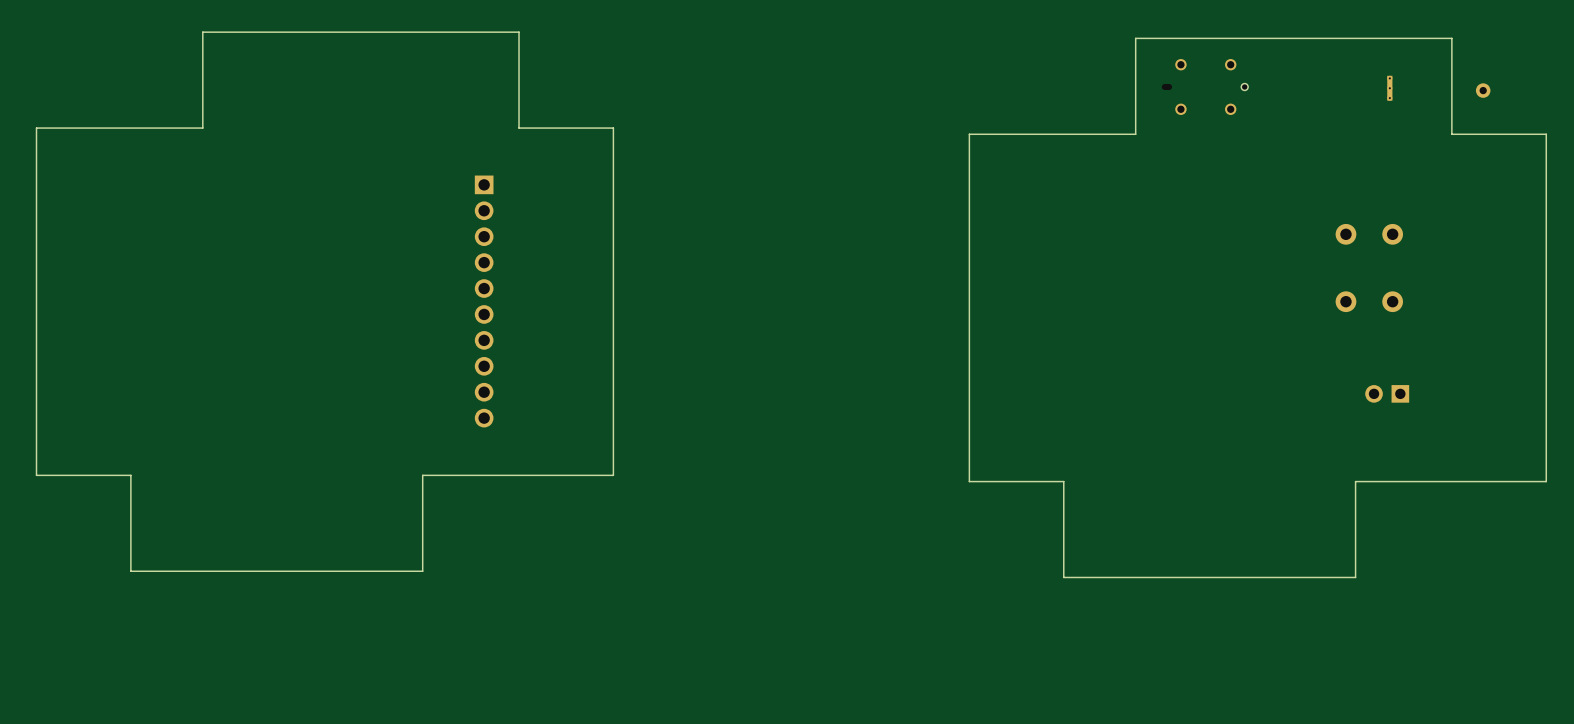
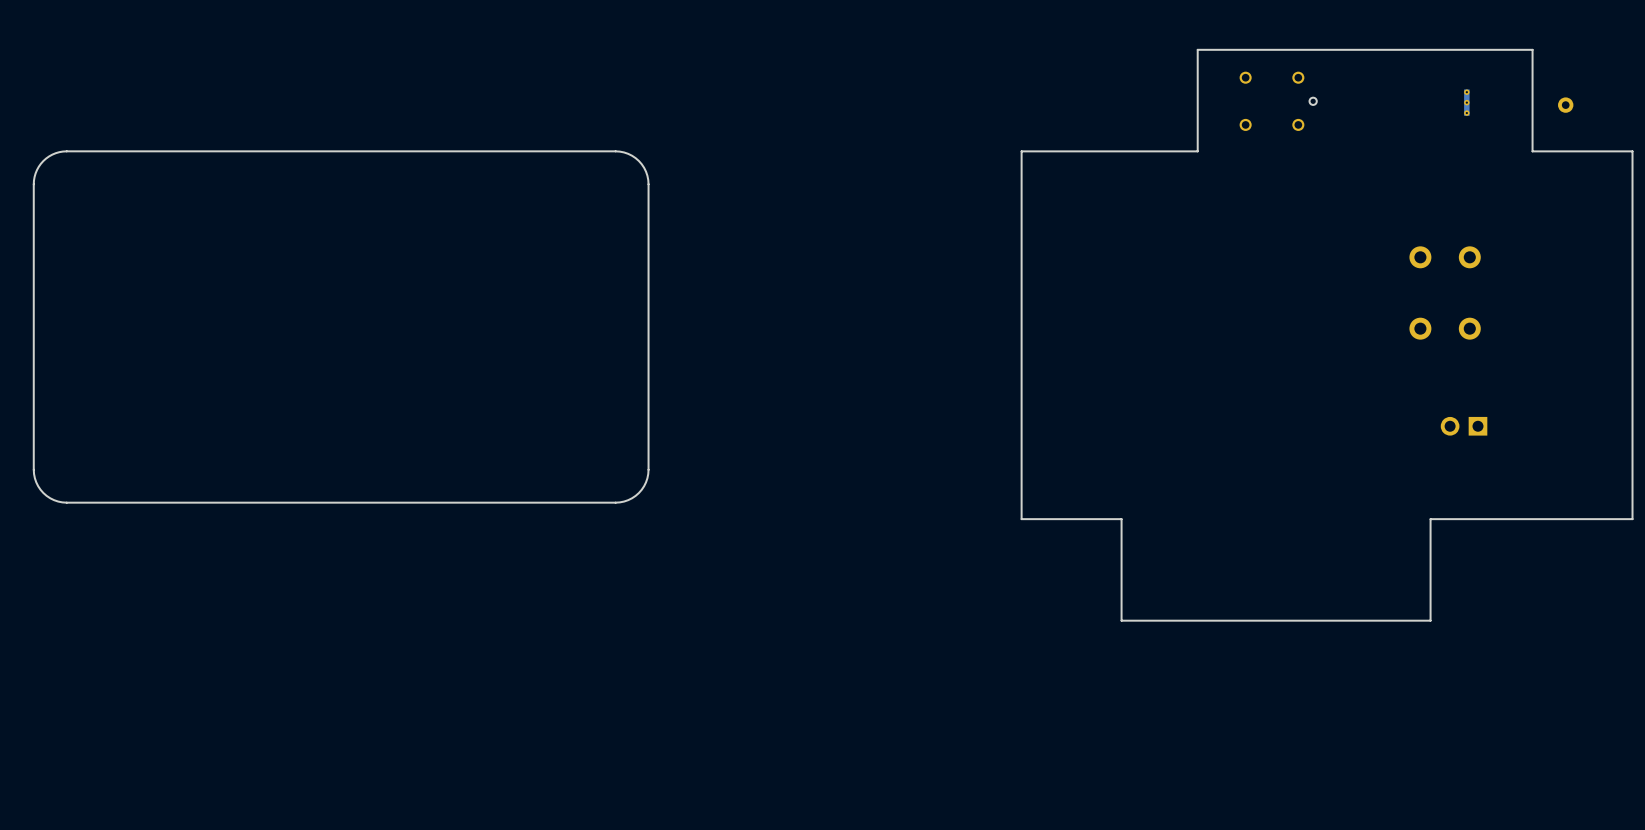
board edge: (36, 165) (36, 128) (202, 128) (202, 32) (519, 32) (519, 128) (613, 128) (613, 475) (422, 475) (422, 571) (130, 571) (130, 475) (36, 475) (36, 434) -> (33, 184) (35, 173) (43, 160) (52, 154) (66, 151) (615, 151) (628, 153) (638, 160) (646, 171) (648, 184) (648, 469) (646, 482) (641, 489) (628, 500) (615, 502) (66, 502) (54, 500) (43, 493) (36, 482) (33, 469)
part: (484, 301) -> none

